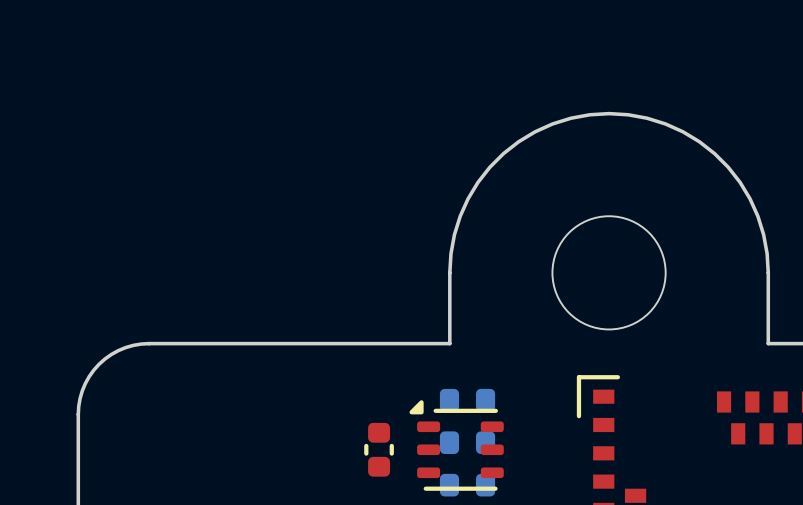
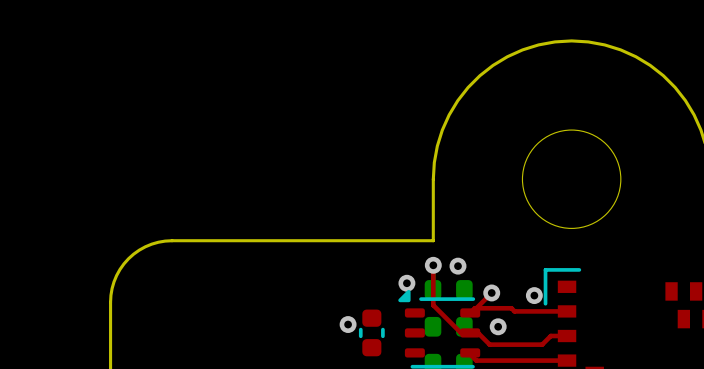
top track: none -> (433, 265) (433, 305) (460, 332) (478, 332) (489, 344) (542, 344) (550, 336) (567, 336)
via: none -> (433, 265)
via: none -> (458, 266)
via: none -> (406, 283)
top track: none -> (491, 292) (476, 308)
via: none -> (491, 292)
via: none -> (534, 295)
top track: none -> (567, 311) (514, 311) (511, 308) (474, 308) (470, 312)
via: none -> (348, 324)
via: none -> (498, 326)
top track: none -> (470, 352) (476, 360) (567, 360)

